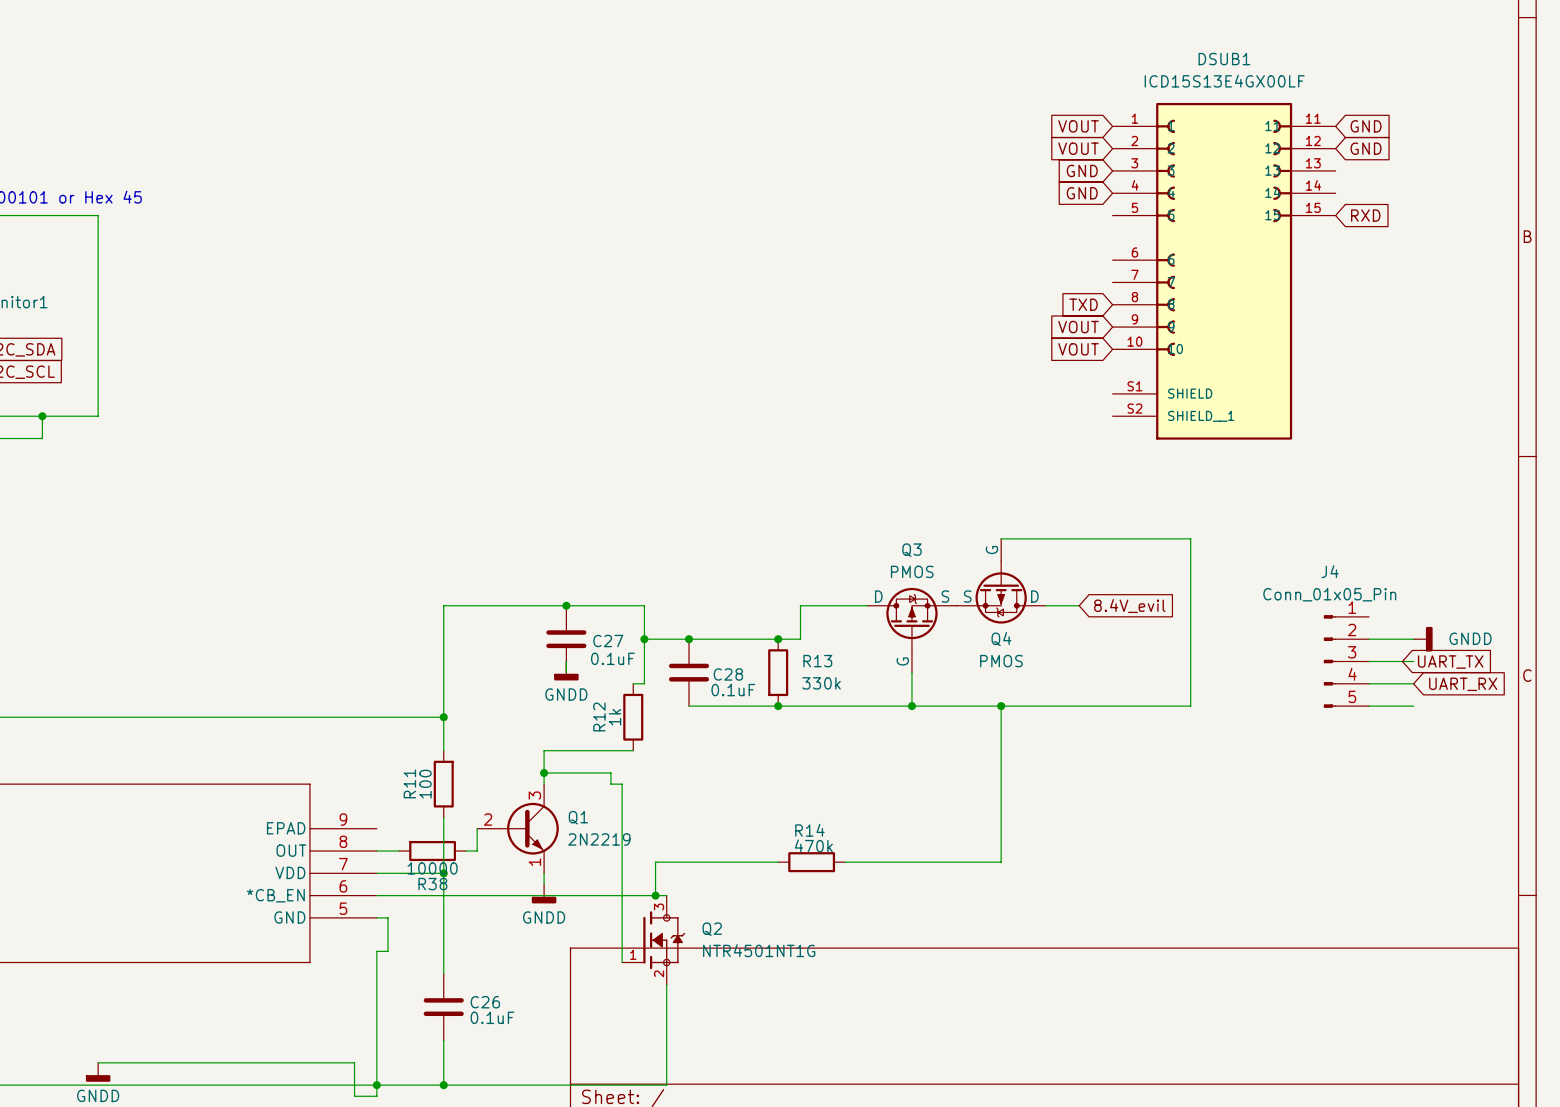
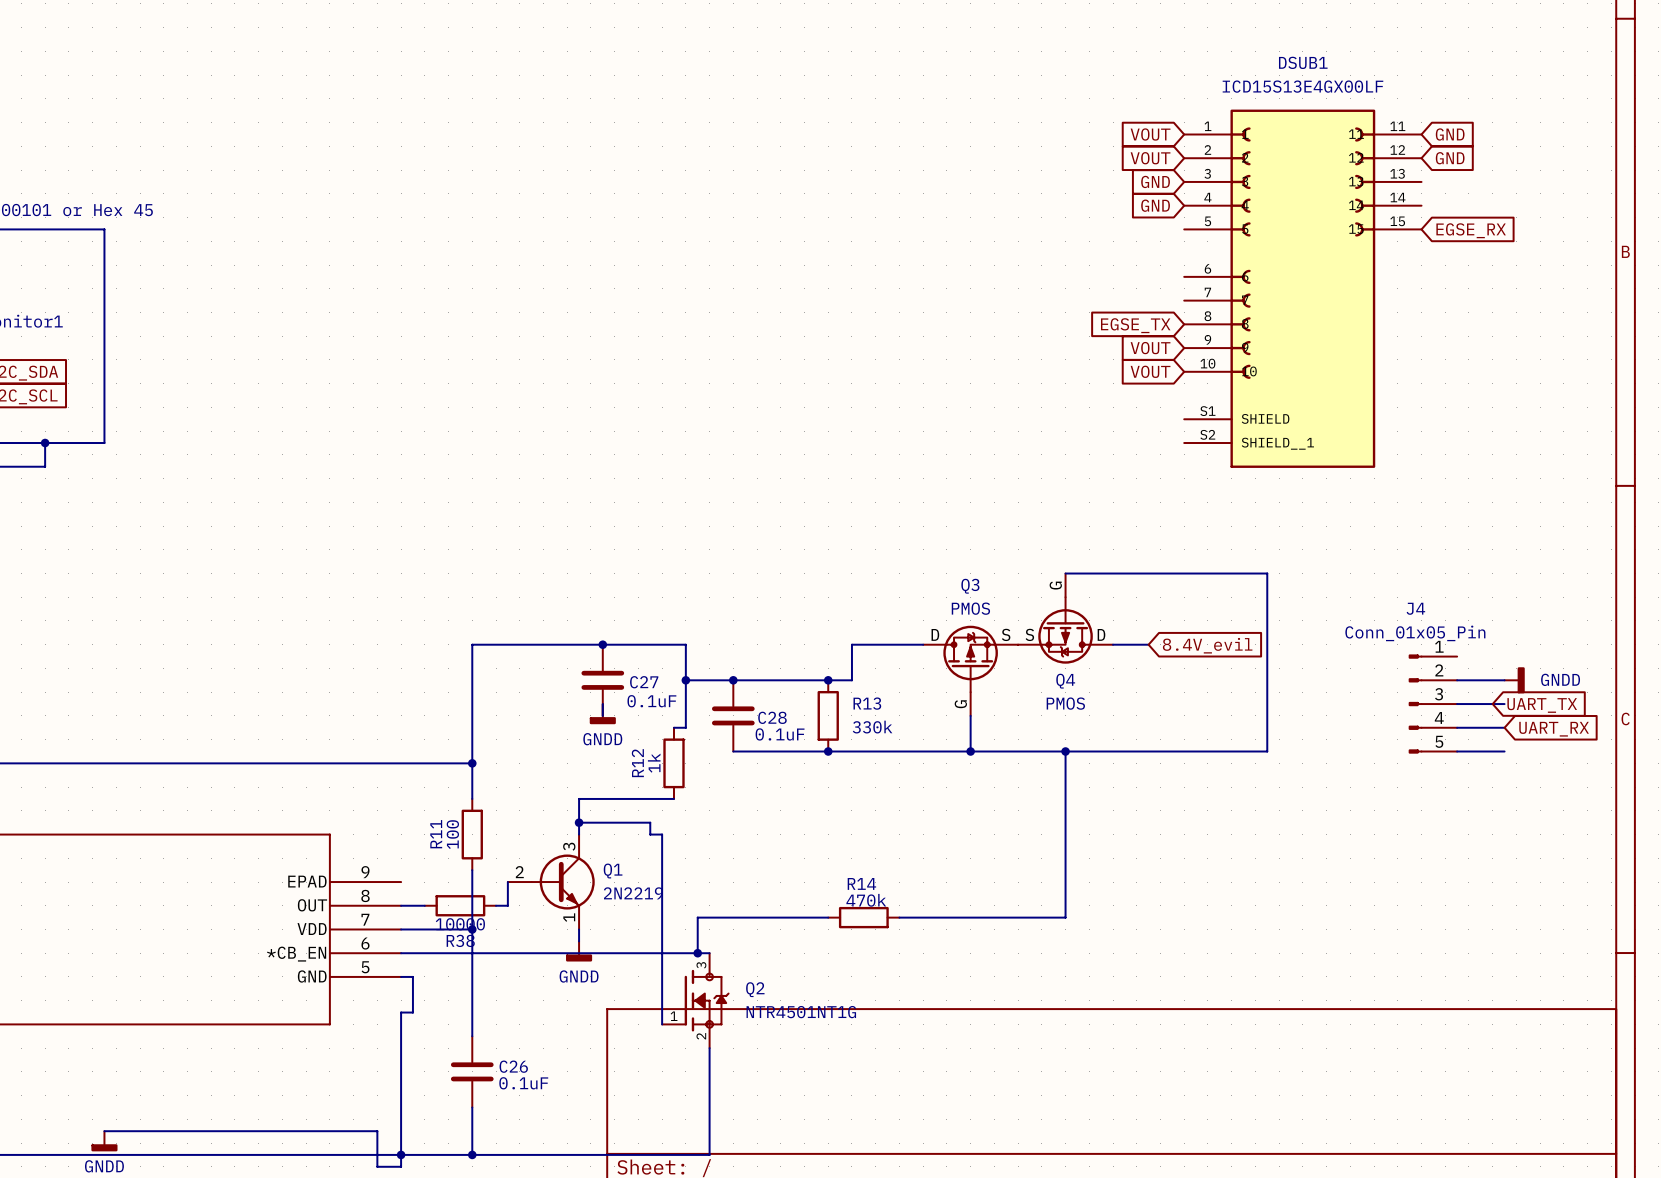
global label: RXD (1365, 215) -> EGSE_RX (1471, 230)
global label: TXD (1083, 304) -> EGSE_TX (1135, 325)

